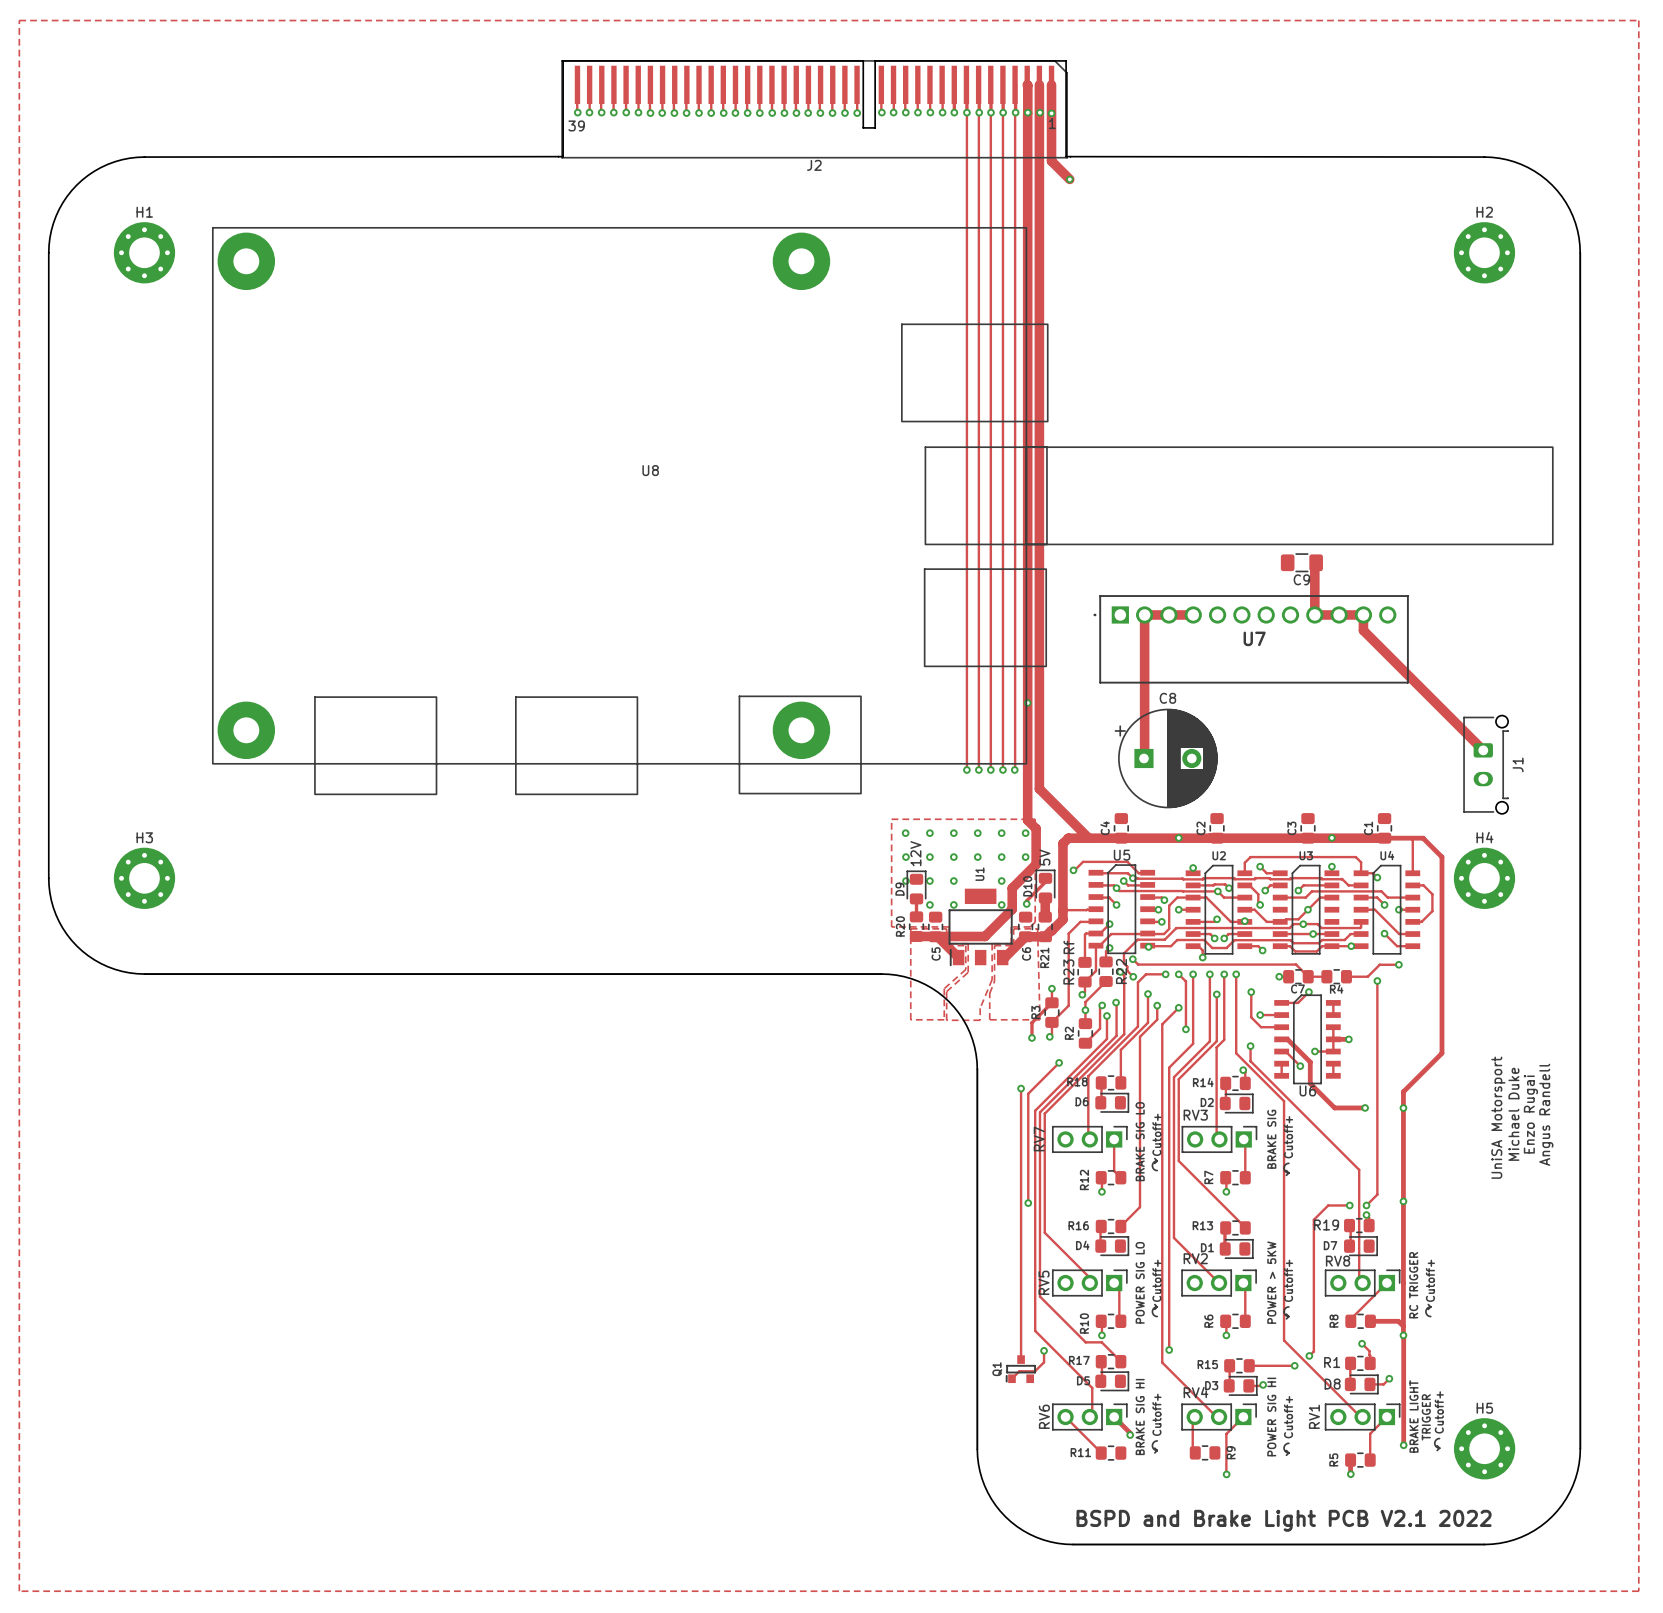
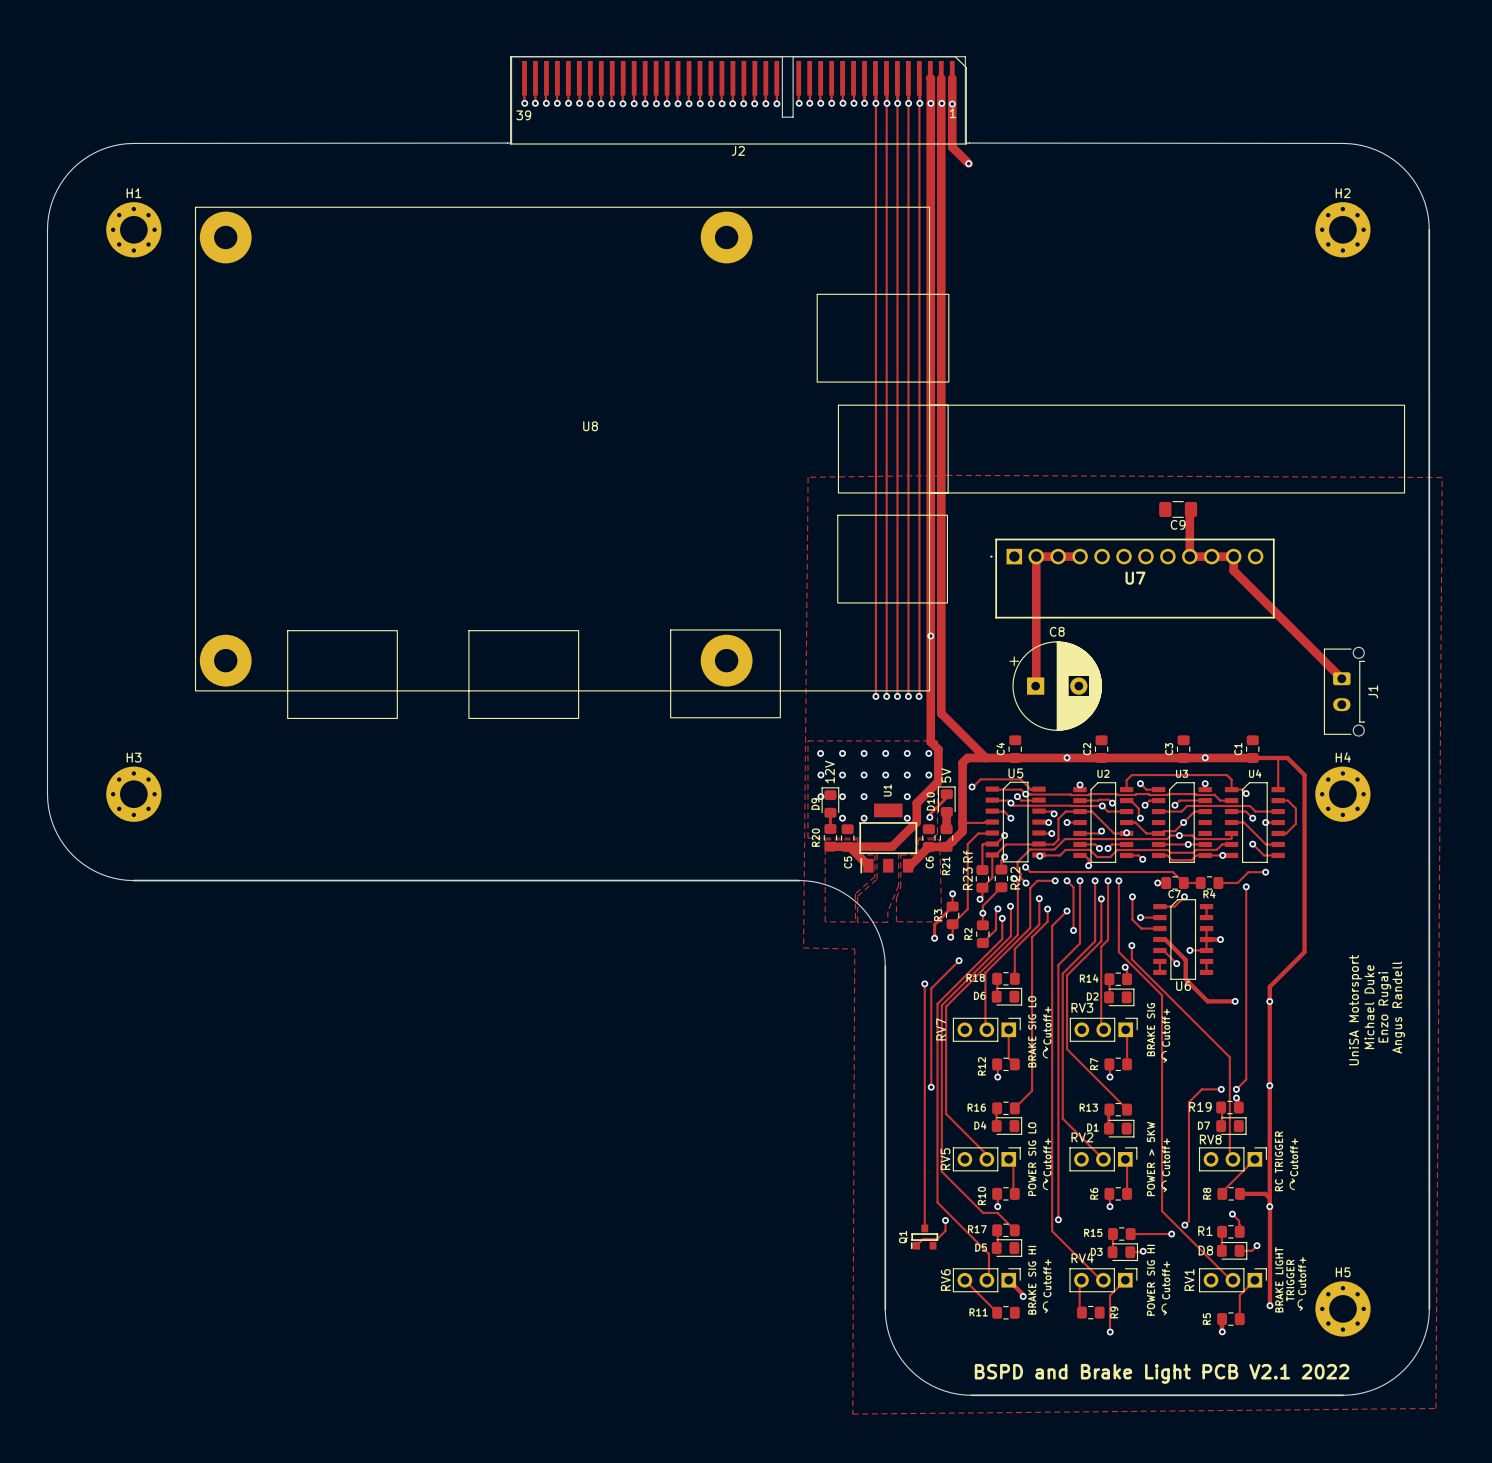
zone outline: (19, 20) (19, 1591) (1638, 1591) (1638, 20) (19, 20) -> none
zone outline: none -> (950, 475) (1442, 477) (1435, 1408) (852, 1414) (854, 949) (803, 947) (808, 477) (950, 475)

